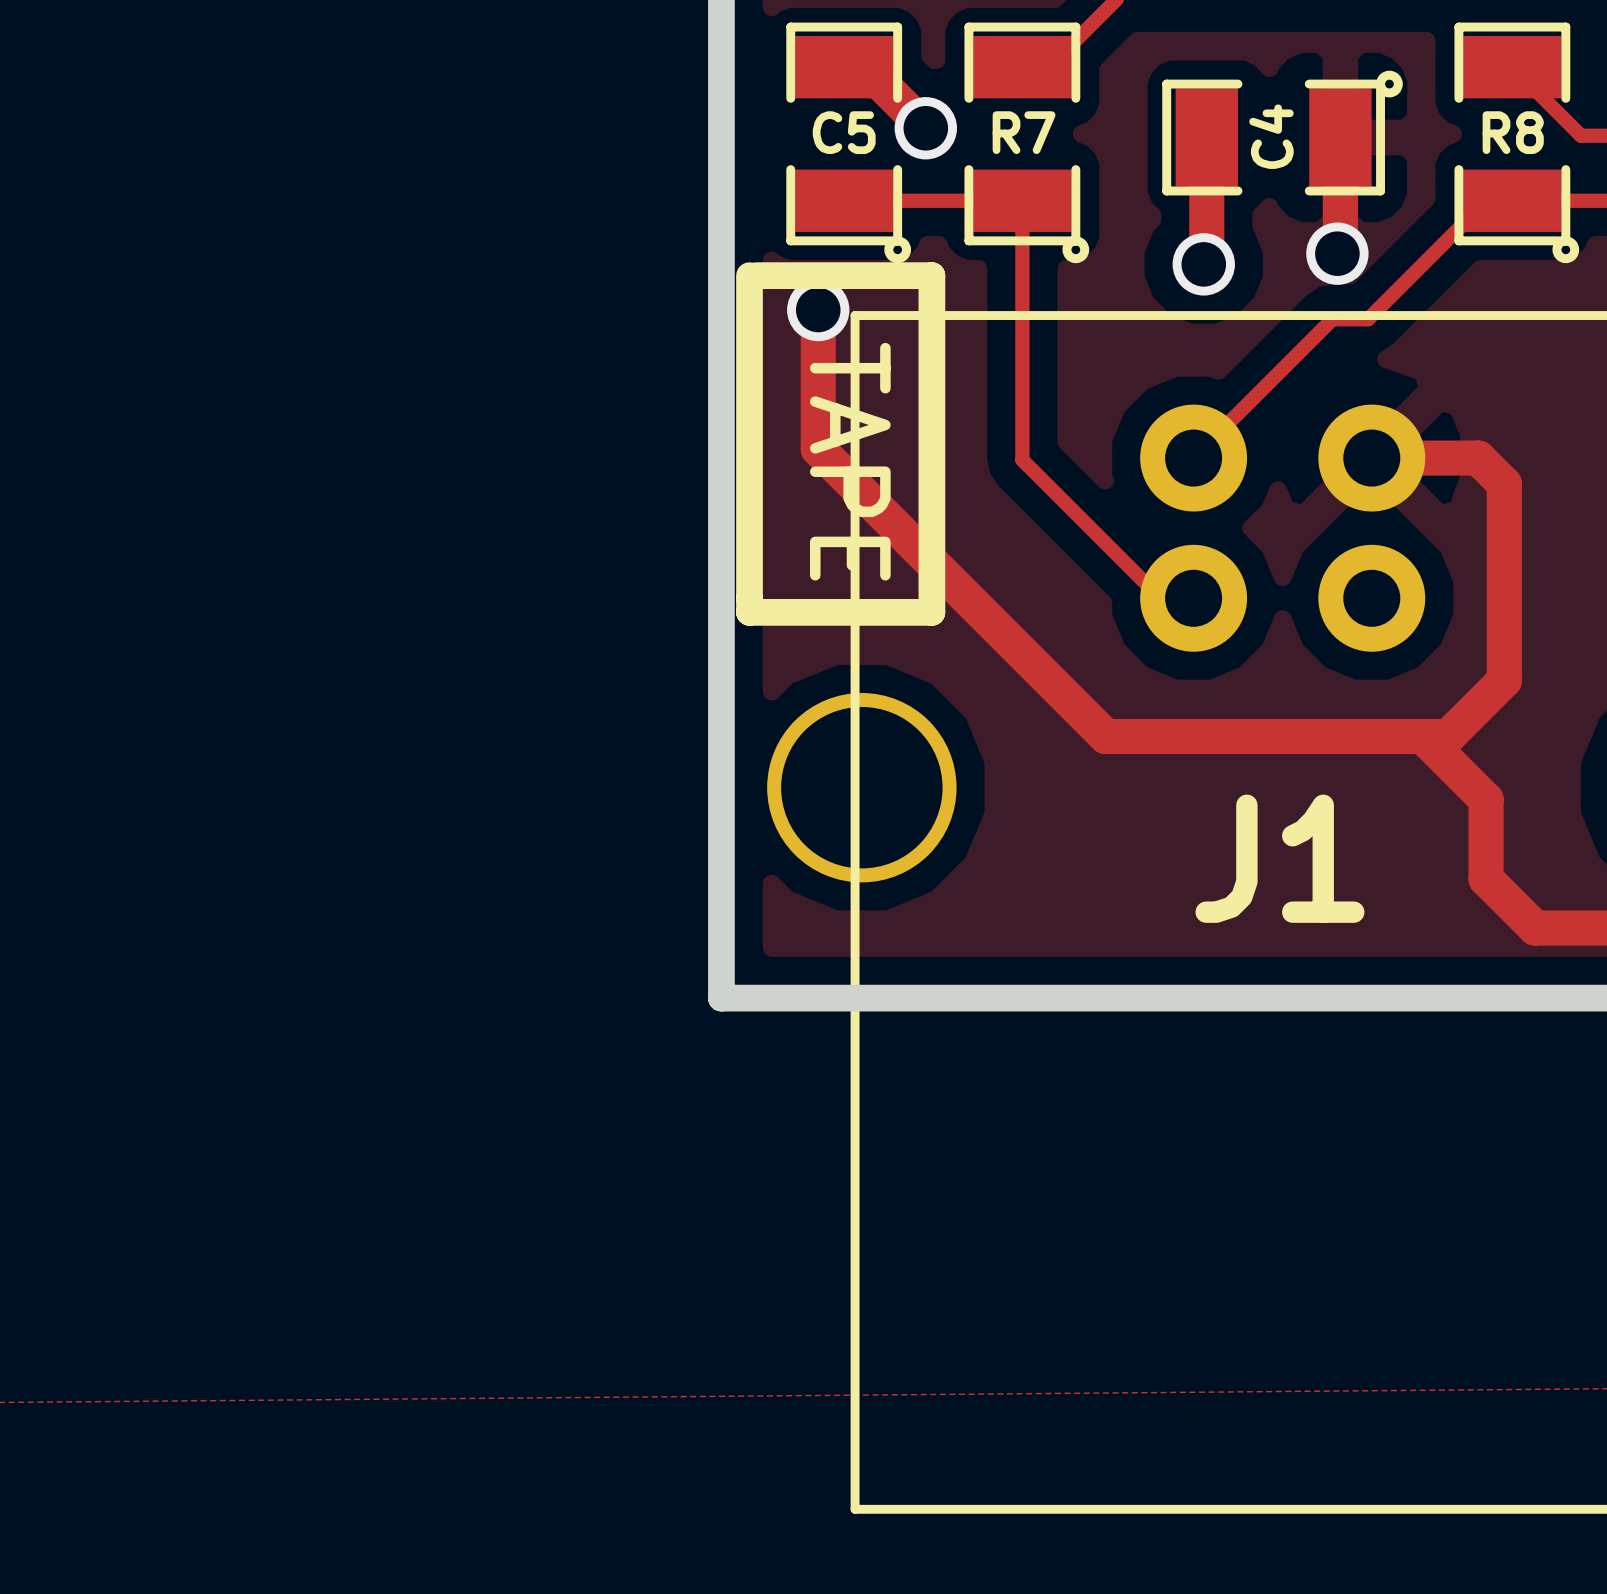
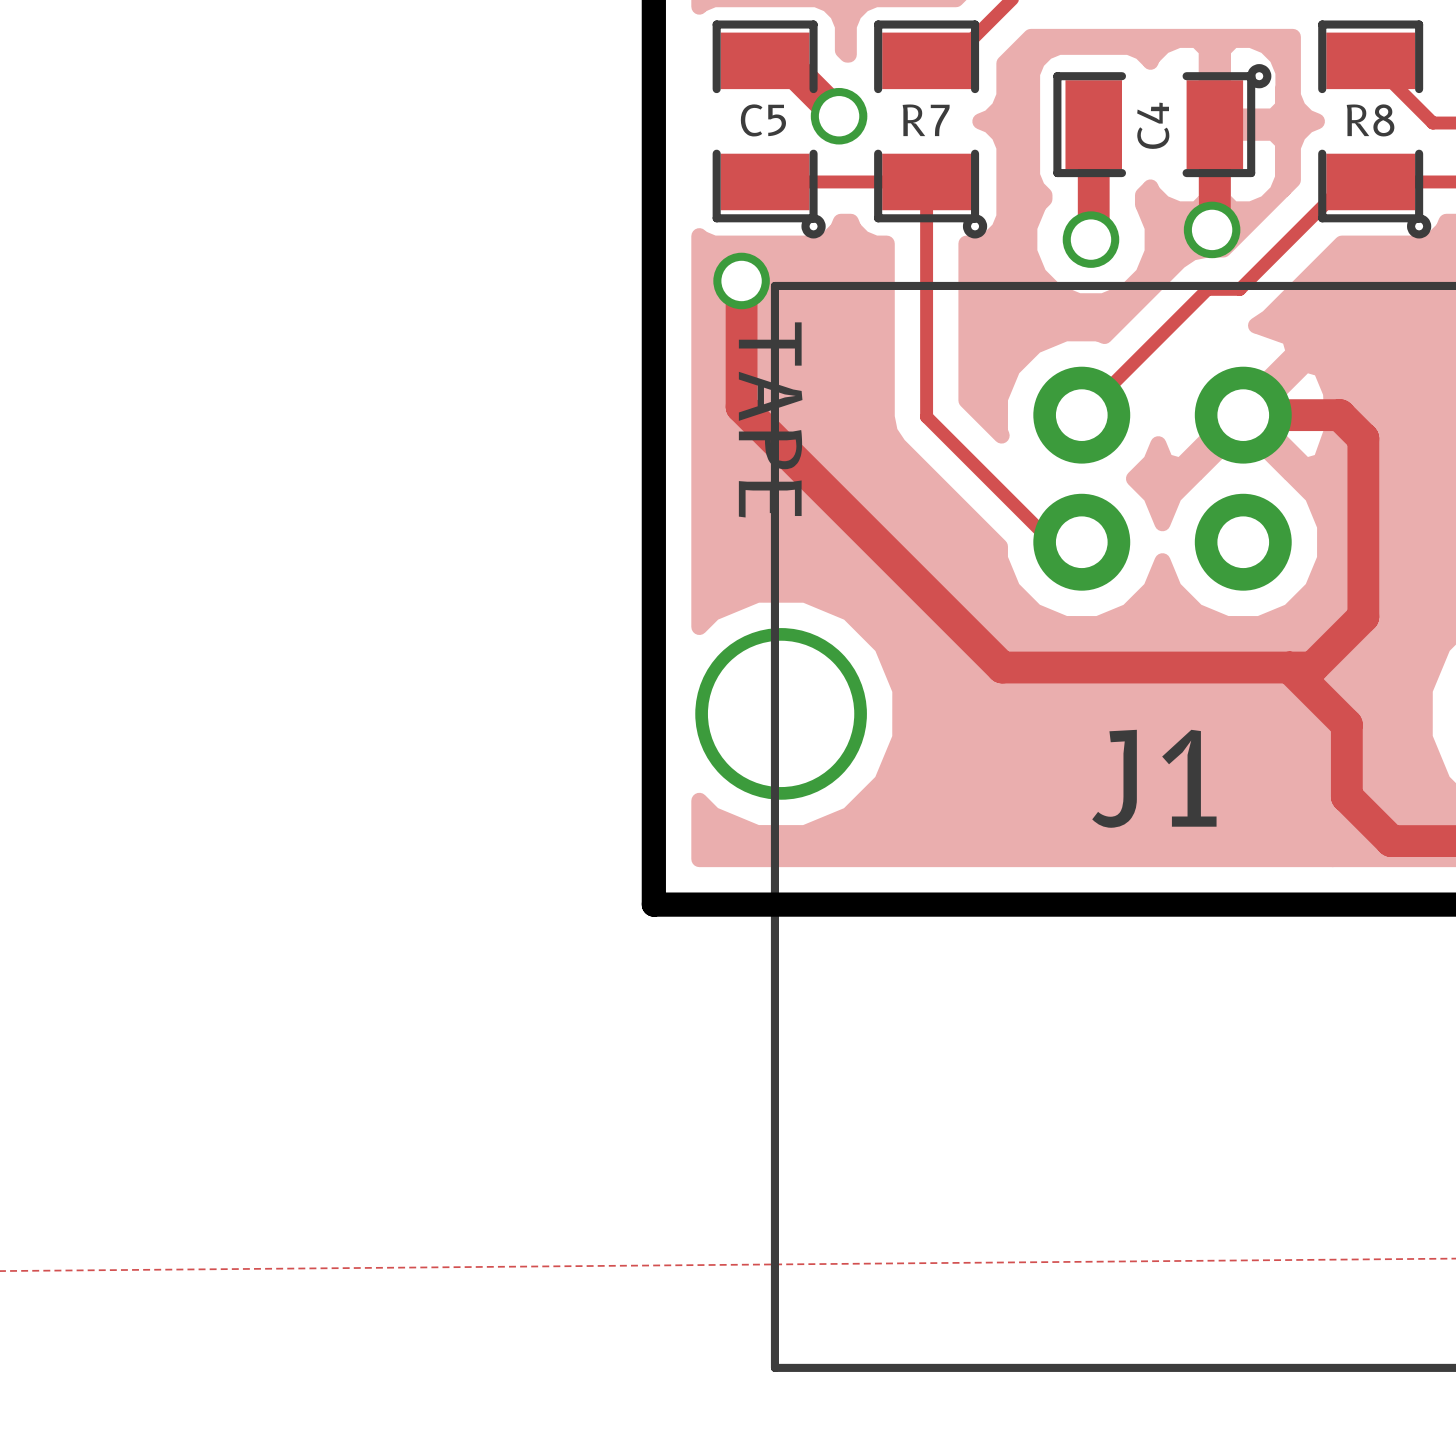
line: (749, 275) (749, 612) (931, 612) (931, 275) (756, 275) -> none

